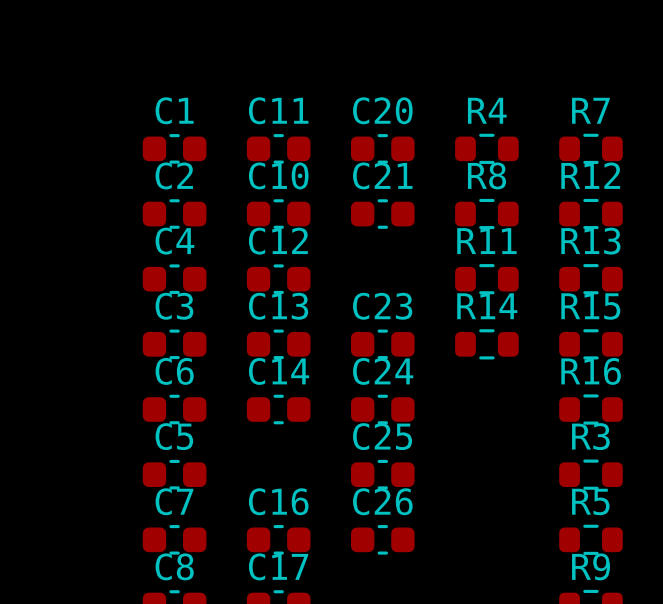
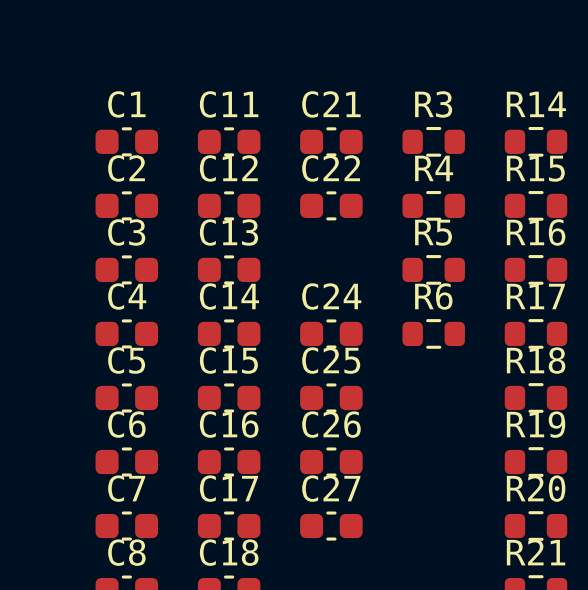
C20 name: C20 (382, 110) -> C21 (331, 104)
R4 name: R4 (487, 110) -> R3 (433, 104)
R7 name: R7 (590, 110) -> R14 (536, 104)
C10 name: C10 (278, 175) -> C12 (228, 168)
C21 name: C21 (382, 175) -> C22 (331, 168)
R8 name: R8 (486, 175) -> R4 (434, 168)
R12 name: R12 (590, 175) -> R15 (535, 168)
C4 name: C4 (174, 241) -> C3 (126, 232)
C12 name: C12 (278, 241) -> C13 (228, 232)
R11 name: R11 (486, 241) -> R5 (433, 232)
R13 name: R13 (590, 241) -> R16 (536, 232)
C3 name: C3 (174, 306) -> C4 (127, 296)
C13 name: C13 (278, 306) -> C14 (229, 296)
C23 name: C23 (382, 306) -> C24 (331, 296)
R14 name: R14 (487, 306) -> R6 (433, 296)
R15 name: R15 (590, 306) -> R17 (535, 296)
C6 name: C6 (174, 371) -> C5 (126, 360)
C14 name: C14 (279, 371) -> C15 (228, 360)
C24 name: C24 (383, 371) -> C25 (331, 360)
R16 name: R16 (591, 371) -> R18 (536, 360)
C5 name: C5 (174, 436) -> C6 (126, 424)
C25 name: C25 (382, 436) -> C26 (331, 424)
R3 name: R3 (590, 436) -> R19 (536, 424)
C16: none -> (229, 462)
C16 name: C16 (278, 501) -> C17 (228, 488)
C26 name: C26 (382, 501) -> C27 (331, 488)
R5 name: R5 (590, 501) -> R20 (536, 488)
C17 name: C17 (278, 566) -> C18 (229, 552)
R9 name: R9 (591, 566) -> R21 (536, 552)

